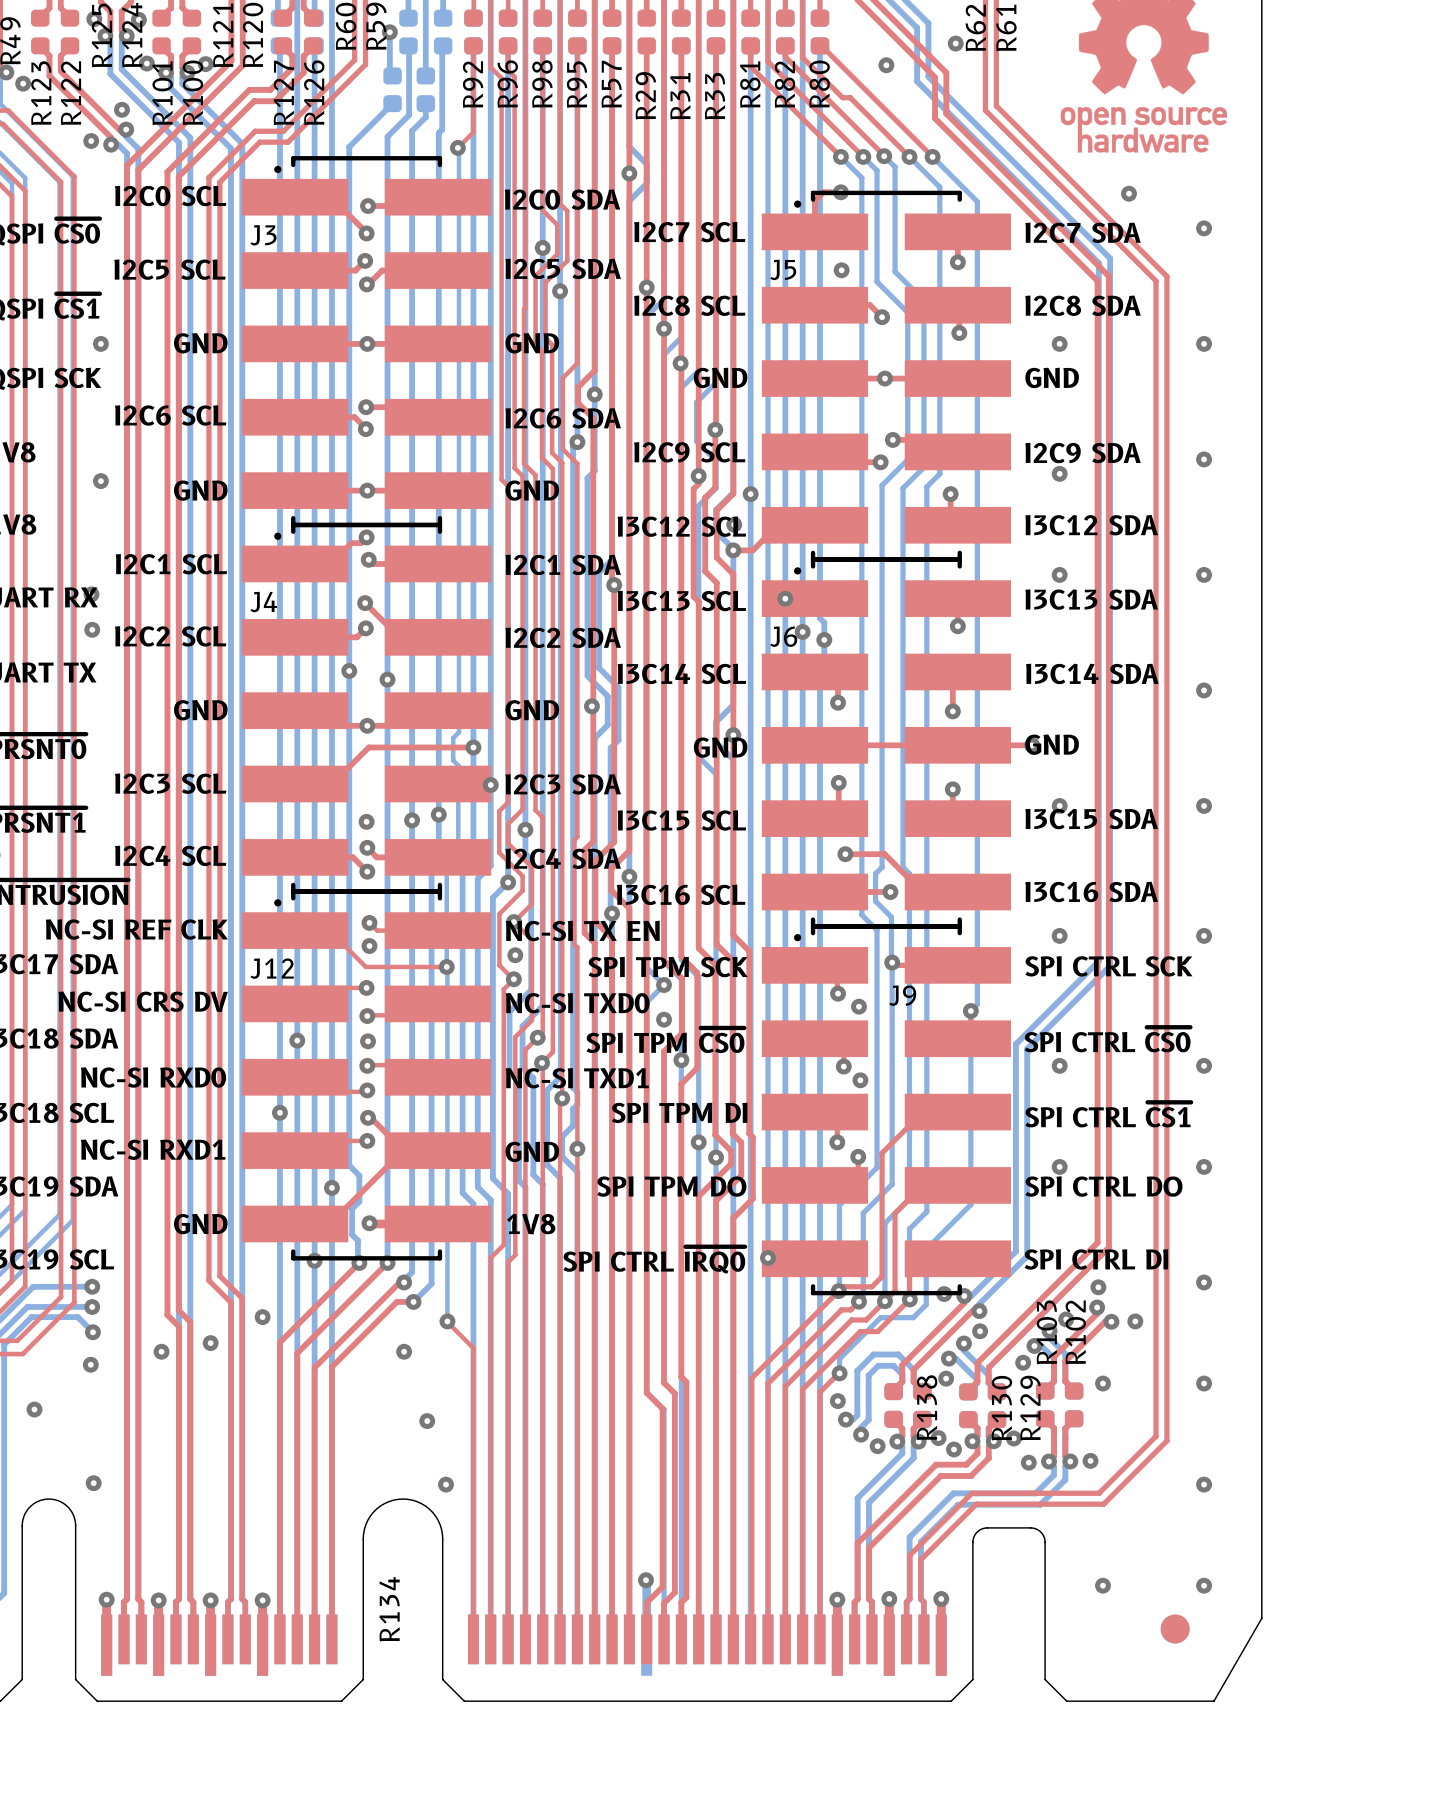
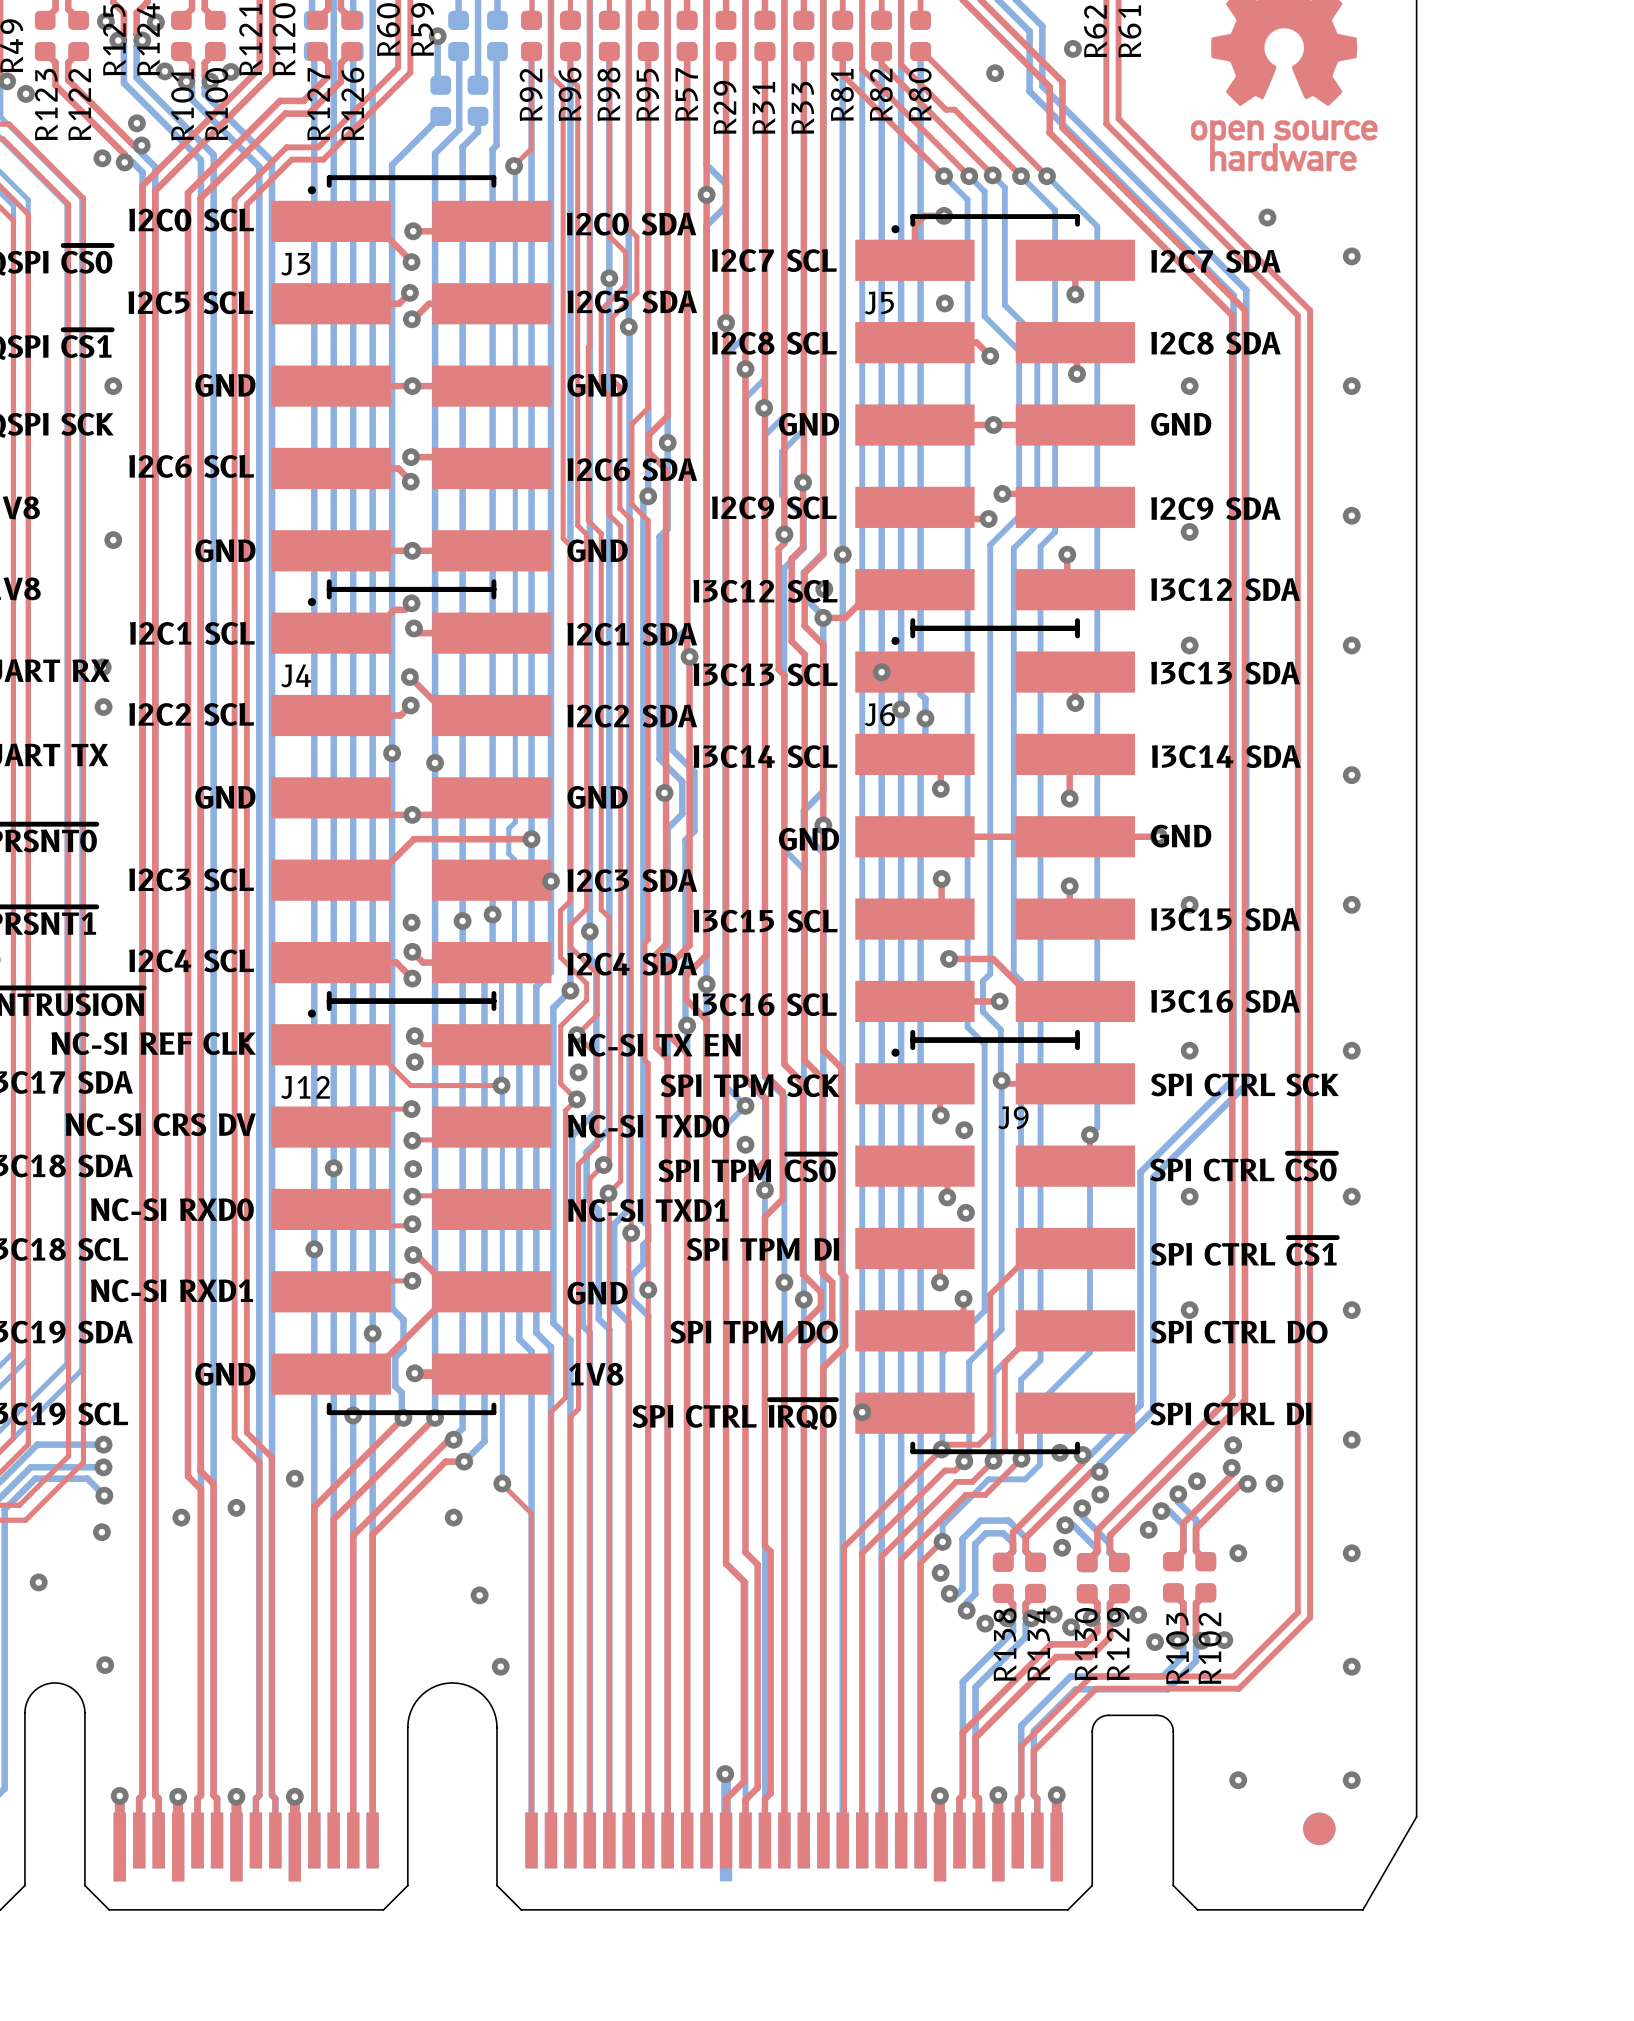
R103 name position: R103 (1046, 1332) -> R103 (1177, 1648)
R102 name position: R102 (1075, 1332) -> R102 (1209, 1648)
R138 name position: R138 (927, 1407) -> R138 (1005, 1644)
R130 name position: R130 (1001, 1408) -> R130 (1086, 1644)
R129 name position: R129 (1030, 1408) -> R129 (1118, 1644)
R134 name position: R134 (389, 1609) -> R134 (1038, 1644)

